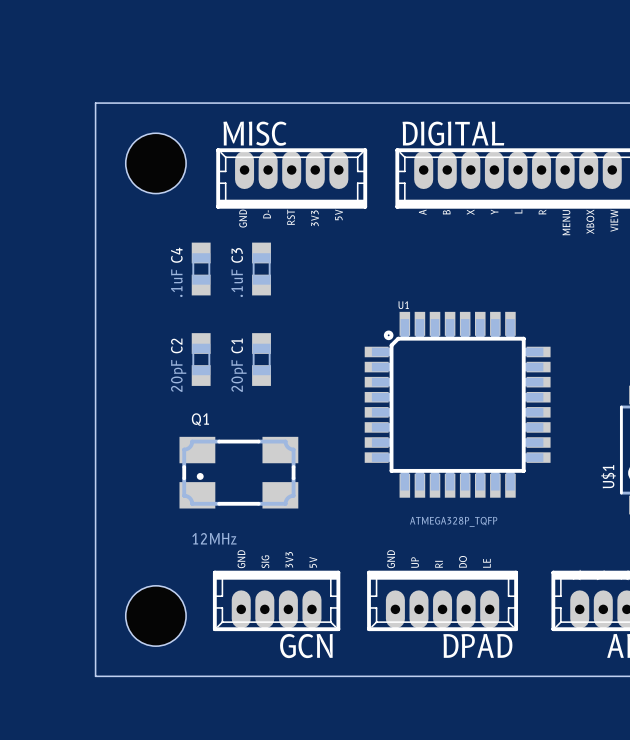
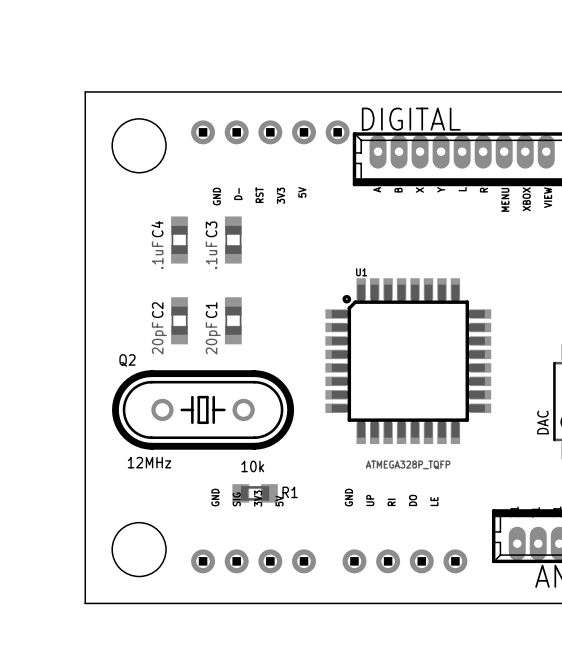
part: none -> (270, 132)
MISC: (291, 178) -> none
Q2: none -> 12MHz (203, 409)
Q1: 12MHz (238, 472) -> none
U$1 name: U$1 (608, 476) -> DAC (542, 422)
R1: none -> 10k (255, 493)
GCN: (276, 600) -> none
DPAD: (442, 600) -> none
part: none -> (253, 561)
part: none -> (404, 561)

